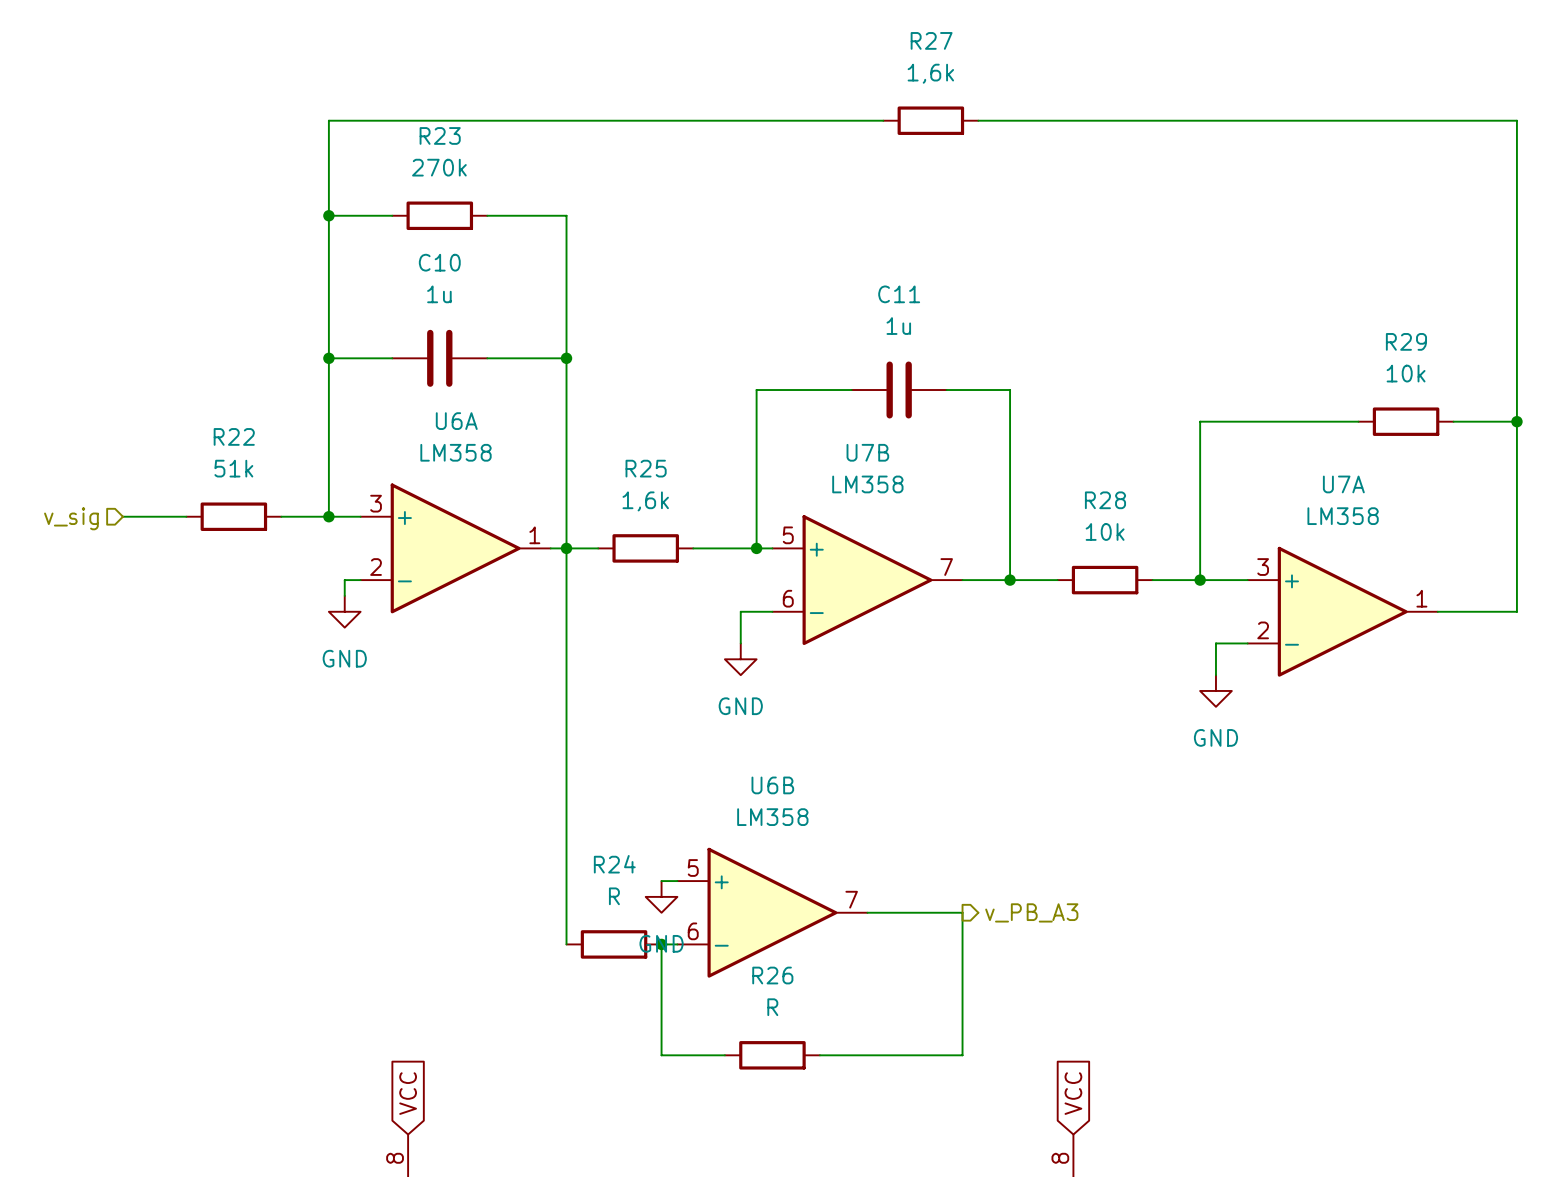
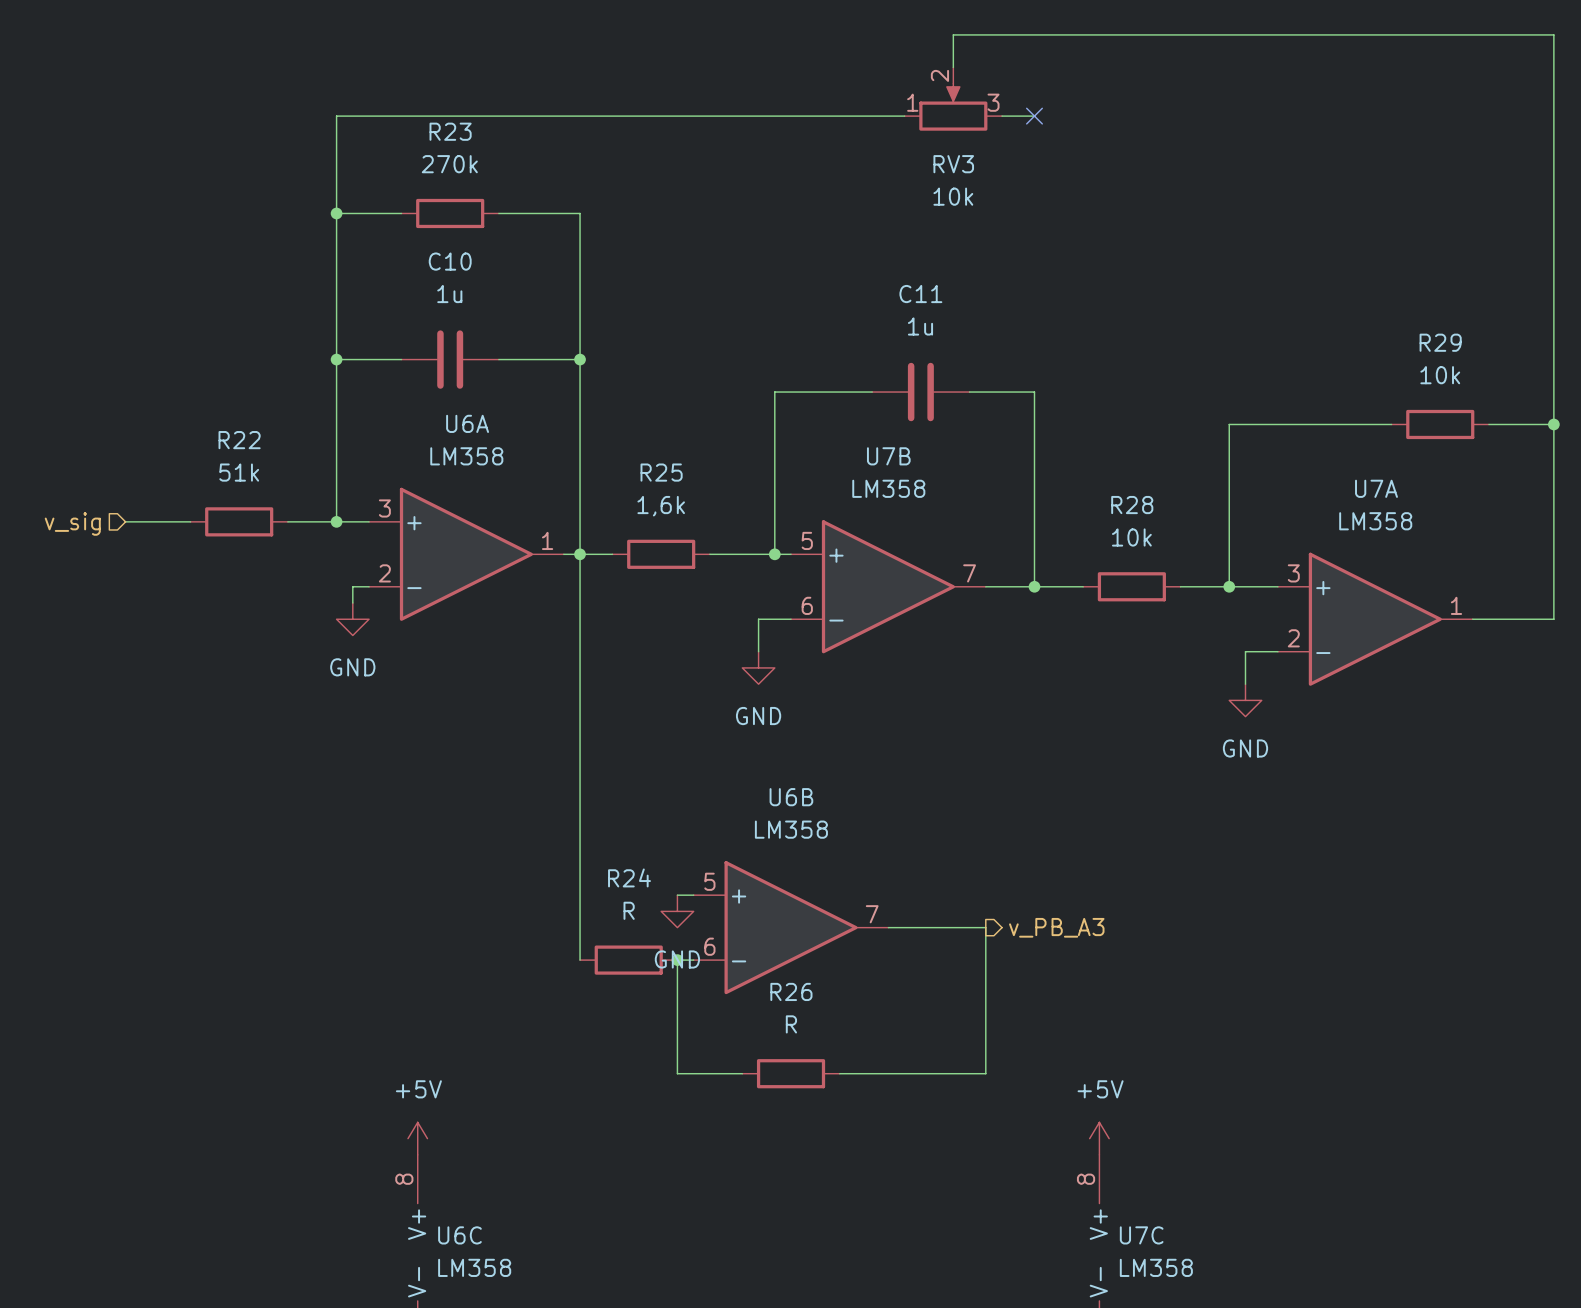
RV3: none -> 10k (953, 99)
R27: 1,6k (930, 120) -> none
wire: (1010, 120) (1516, 120) -> (953, 67) (953, 34) (1553, 34) (1553, 116)
no-connect mark: none -> (1034, 116)
global label: VCC (408, 1093) -> none
global label: VCC (1073, 1093) -> none
power symbol: none -> +5V (417, 1138)
power symbol: none -> +5V (1099, 1138)

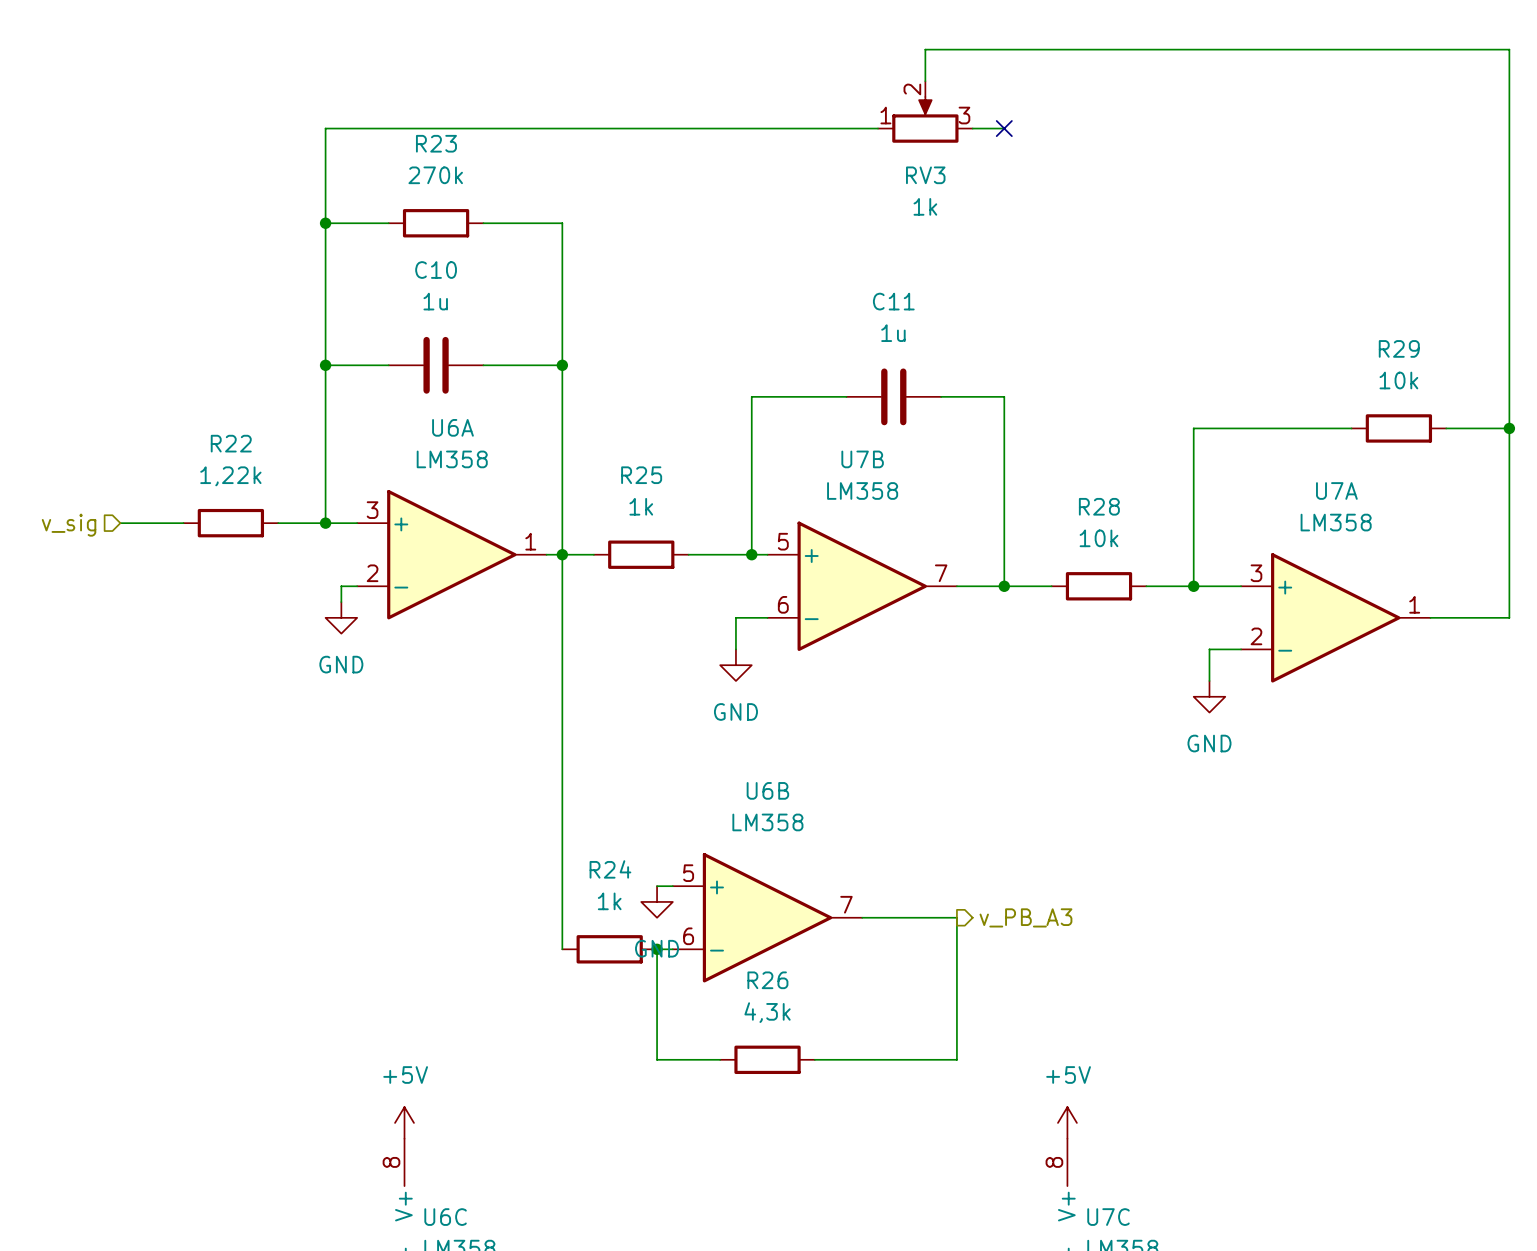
RV3 value: 10k (953, 196) -> 1k (925, 206)
R22 value: 51k (239, 472) -> 1,22k (230, 476)
R25 value: 1,6k (661, 506) -> 1k (641, 506)
R24 value: R (629, 910) -> 1k (609, 901)
R26 value: R (791, 1024) -> 4,3k (767, 1012)

